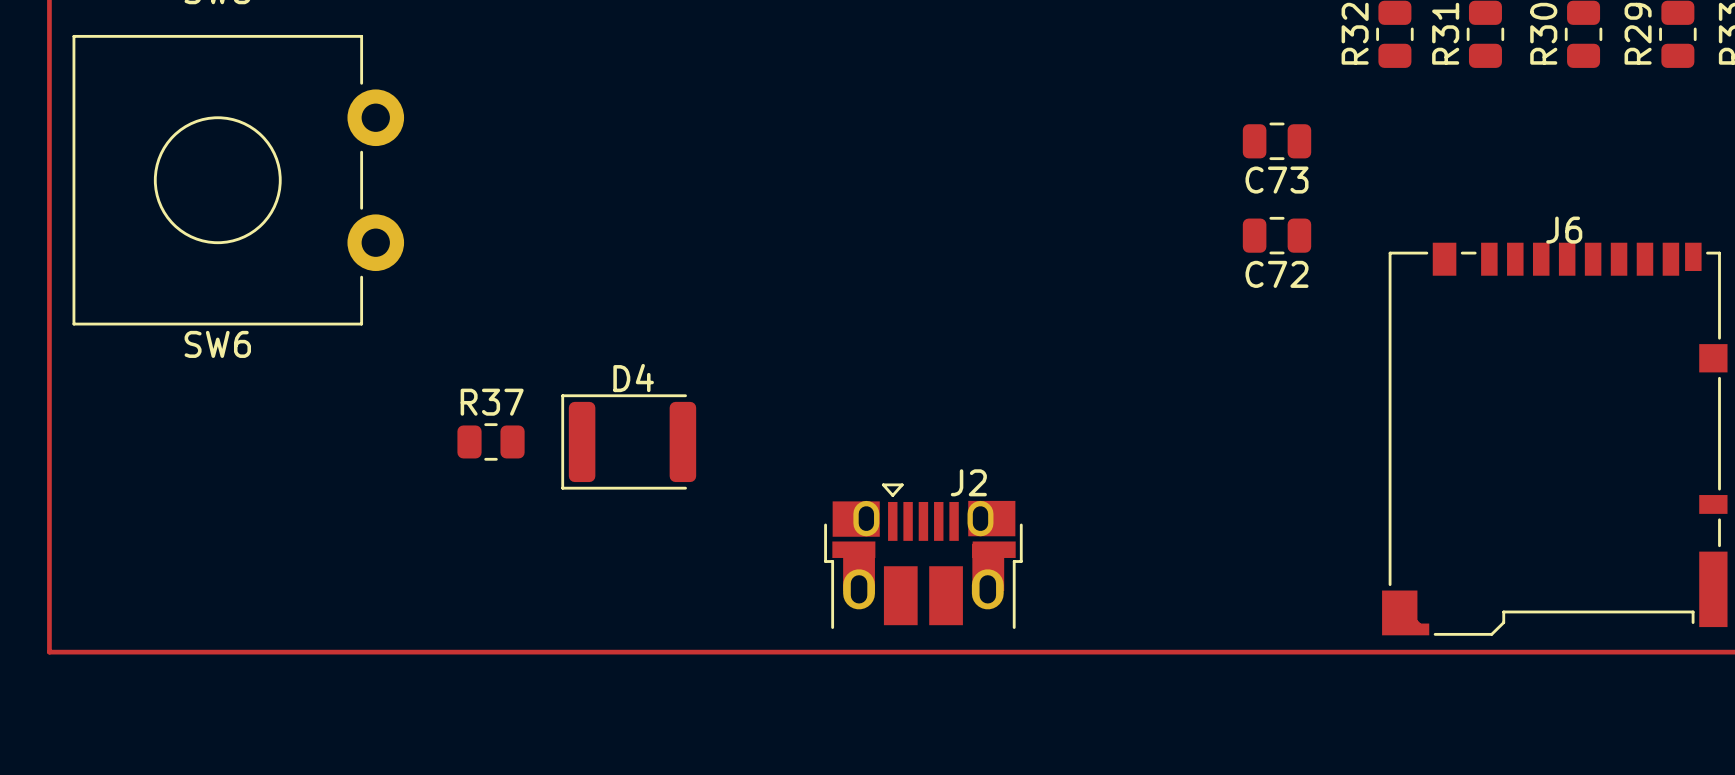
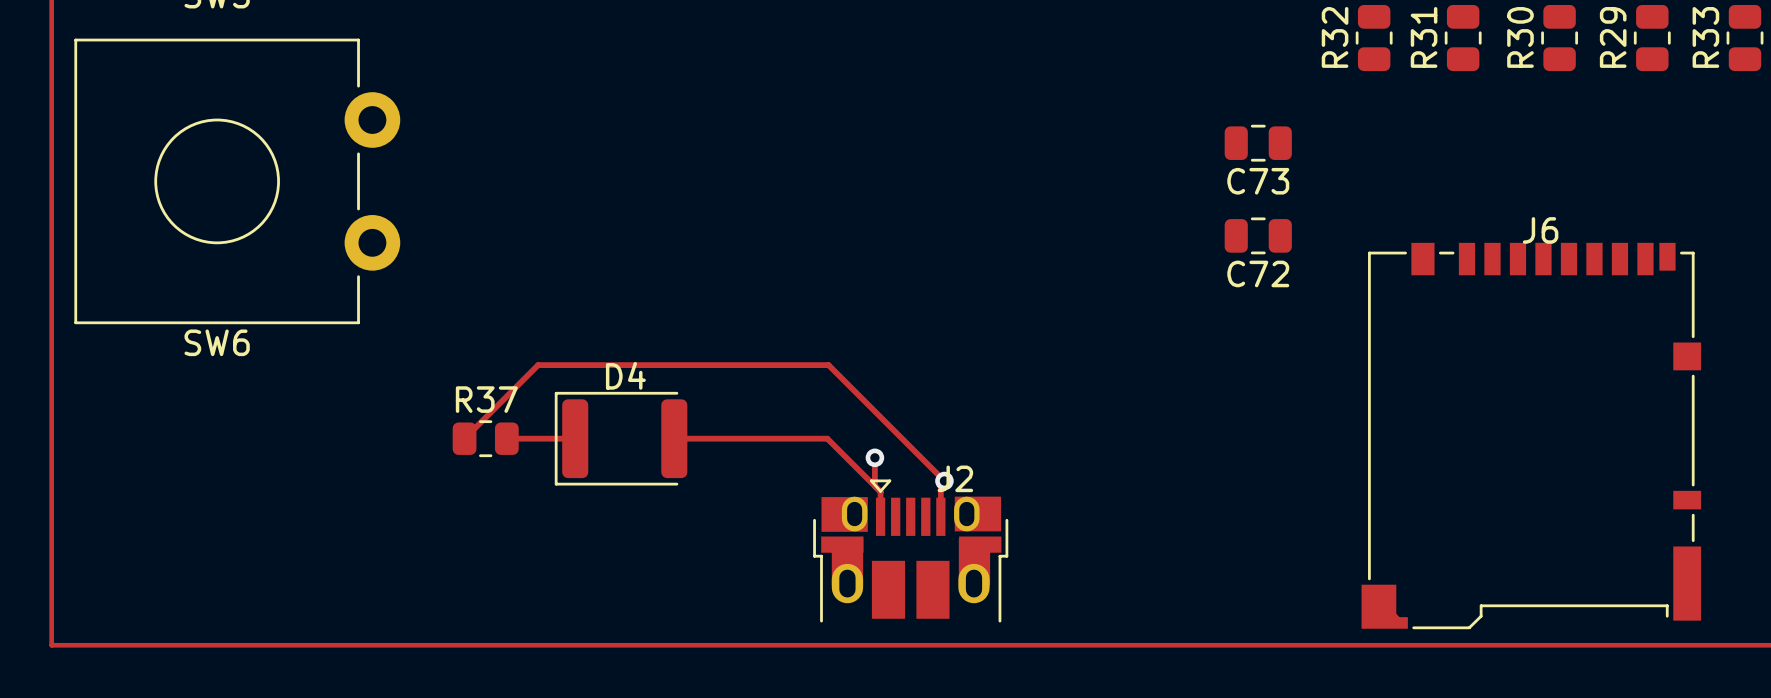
track: none -> (464, 438) (538, 365) (828, 365) (944, 480) (940, 484) (940, 516)
track: none -> (506, 438) (575, 438)
track: none -> (674, 438) (827, 438) (880, 491) (880, 516)
track: none -> (874, 457) (874, 486)
via: none -> (874, 457)
via: none -> (944, 480)

